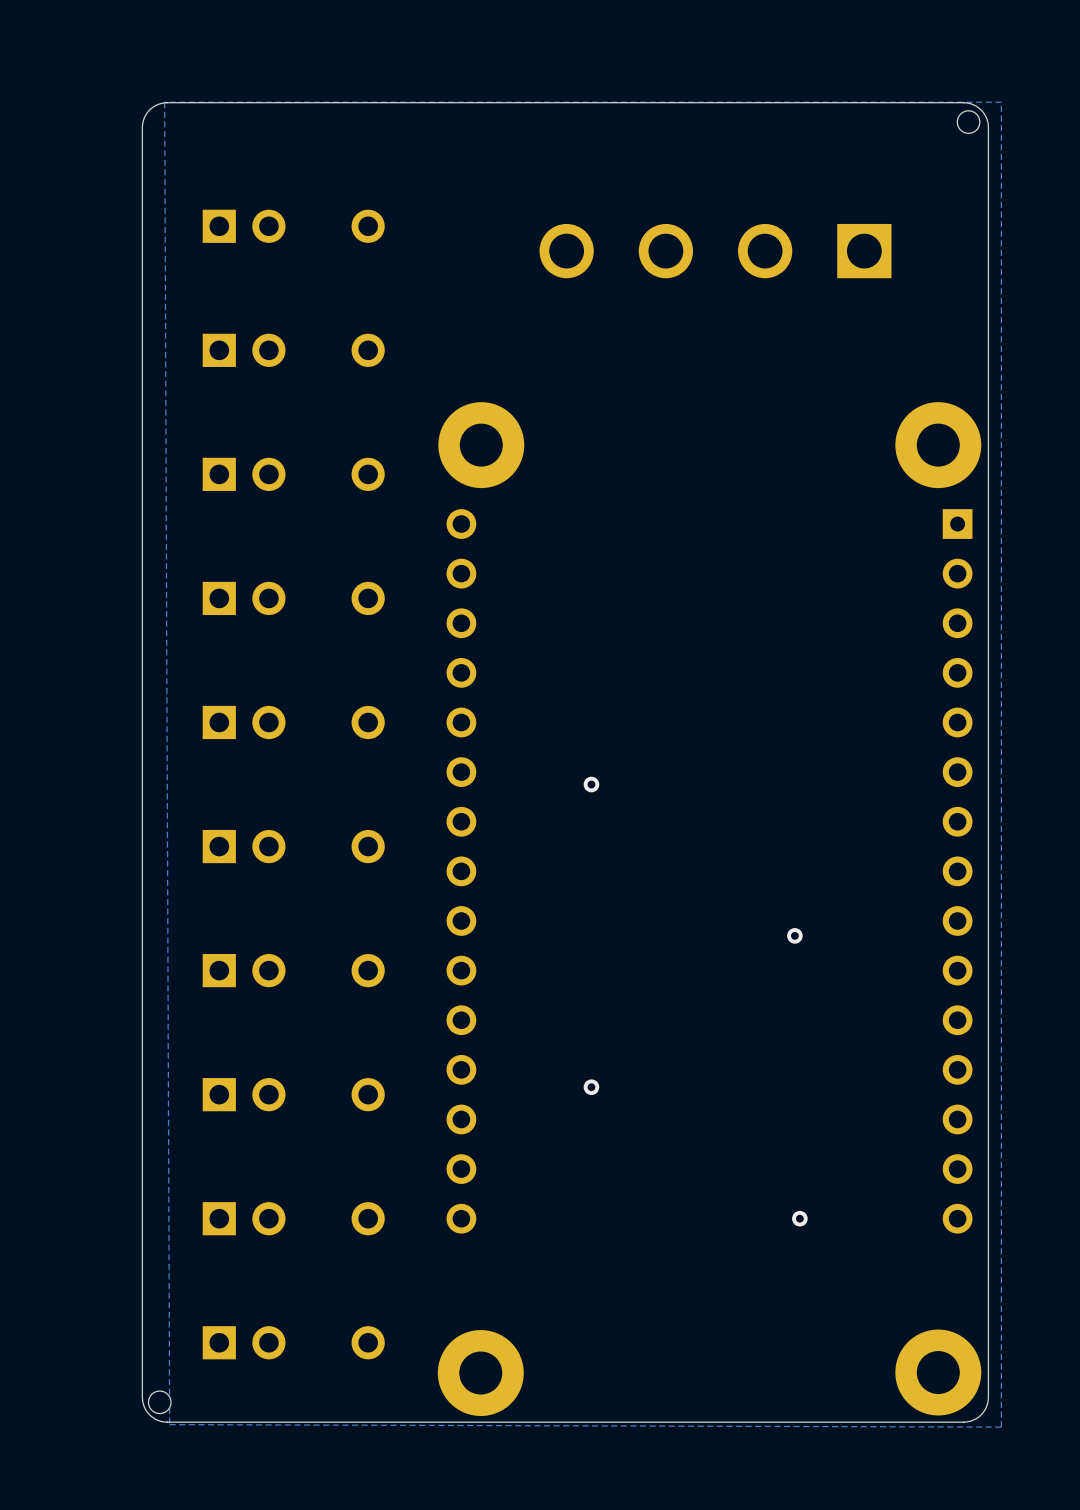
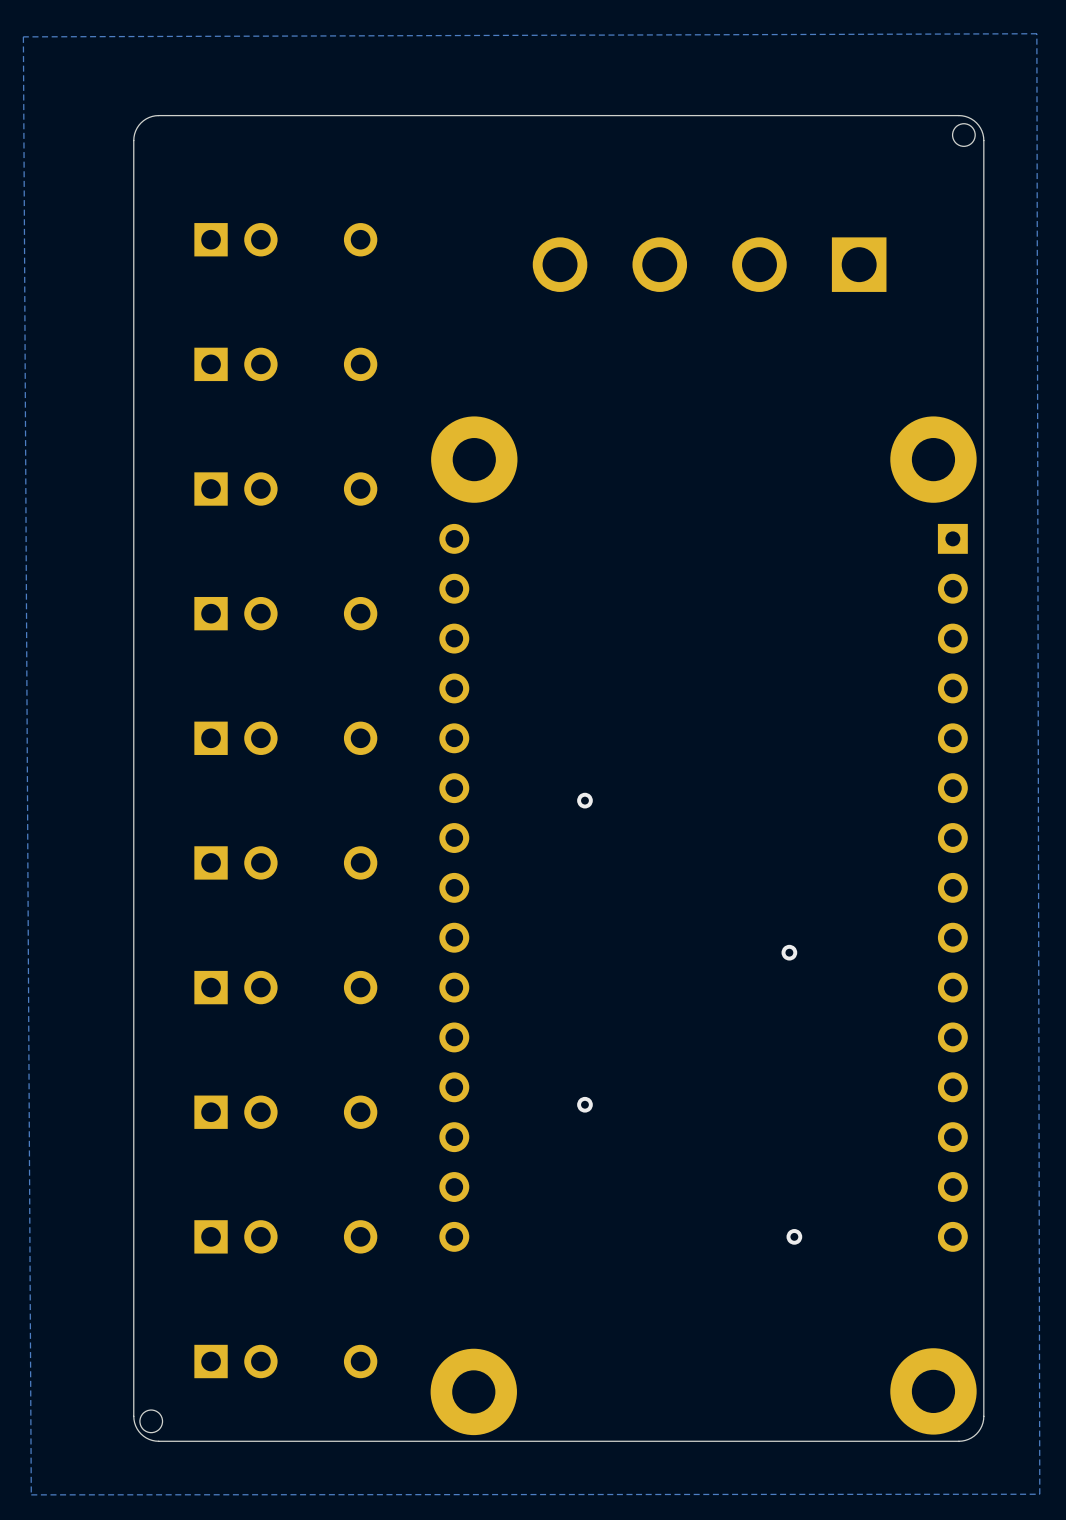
zone outline: (1001, 102) (1001, 1427) (169, 1424) (164, 102) (1001, 102) -> (1036, 33) (1039, 1494) (31, 1494) (23, 36) (1036, 33)

